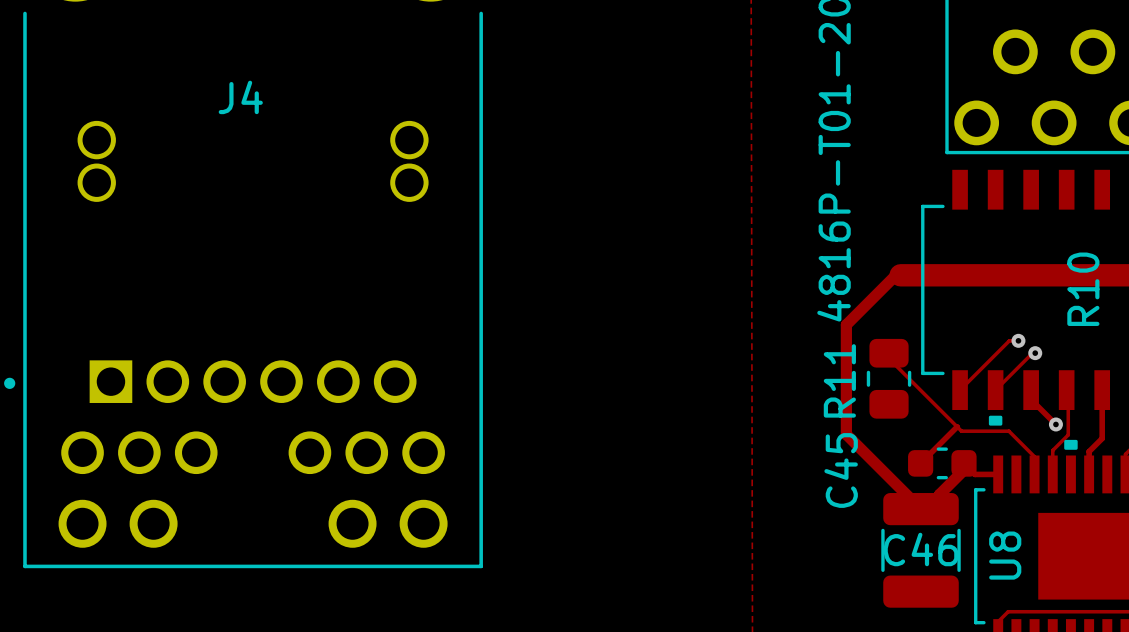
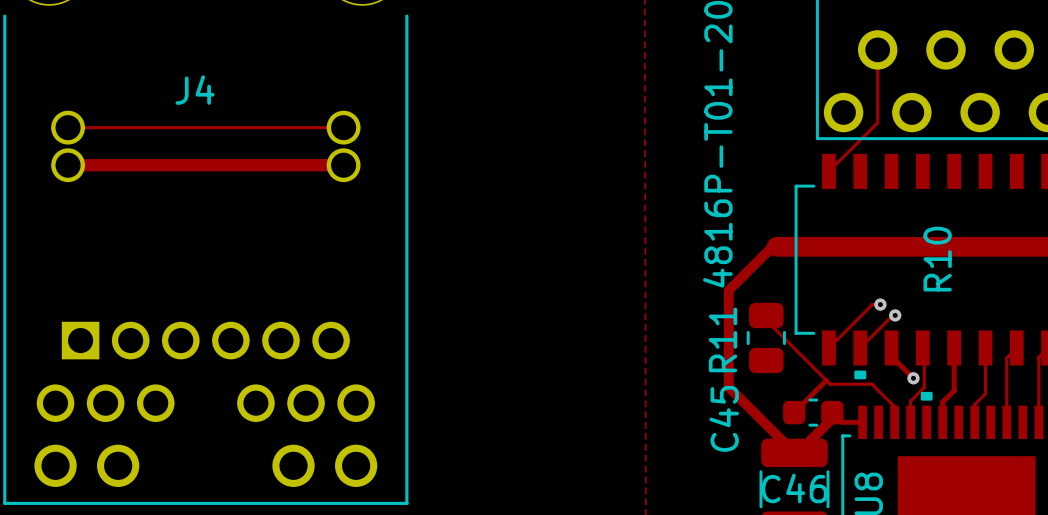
track: none -> (877, 49) (877, 122) (828, 171)
track: none -> (68, 127) (343, 127)
track: none -> (68, 165) (343, 165)

